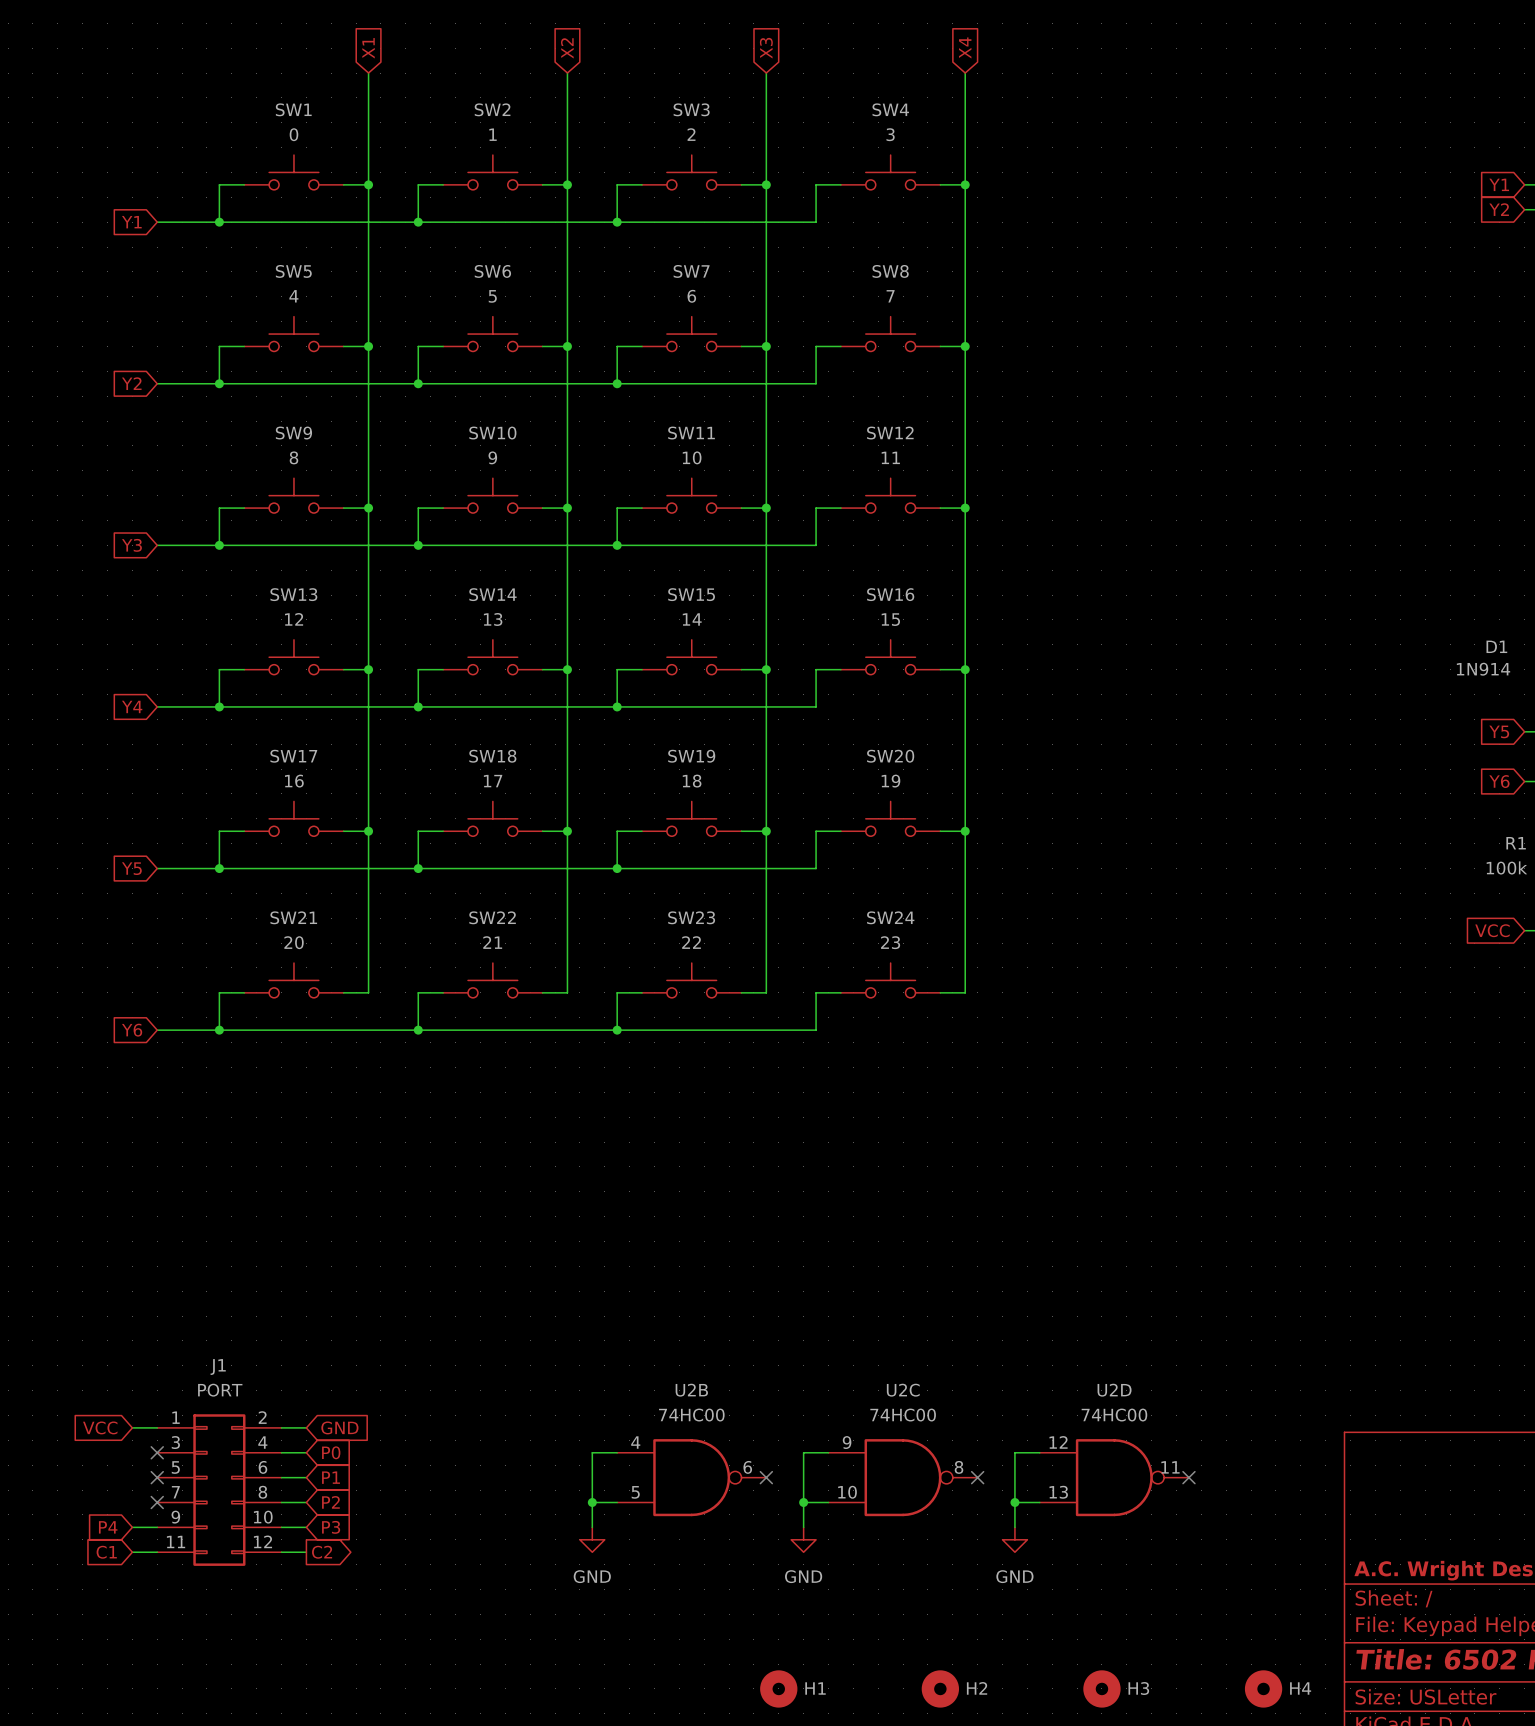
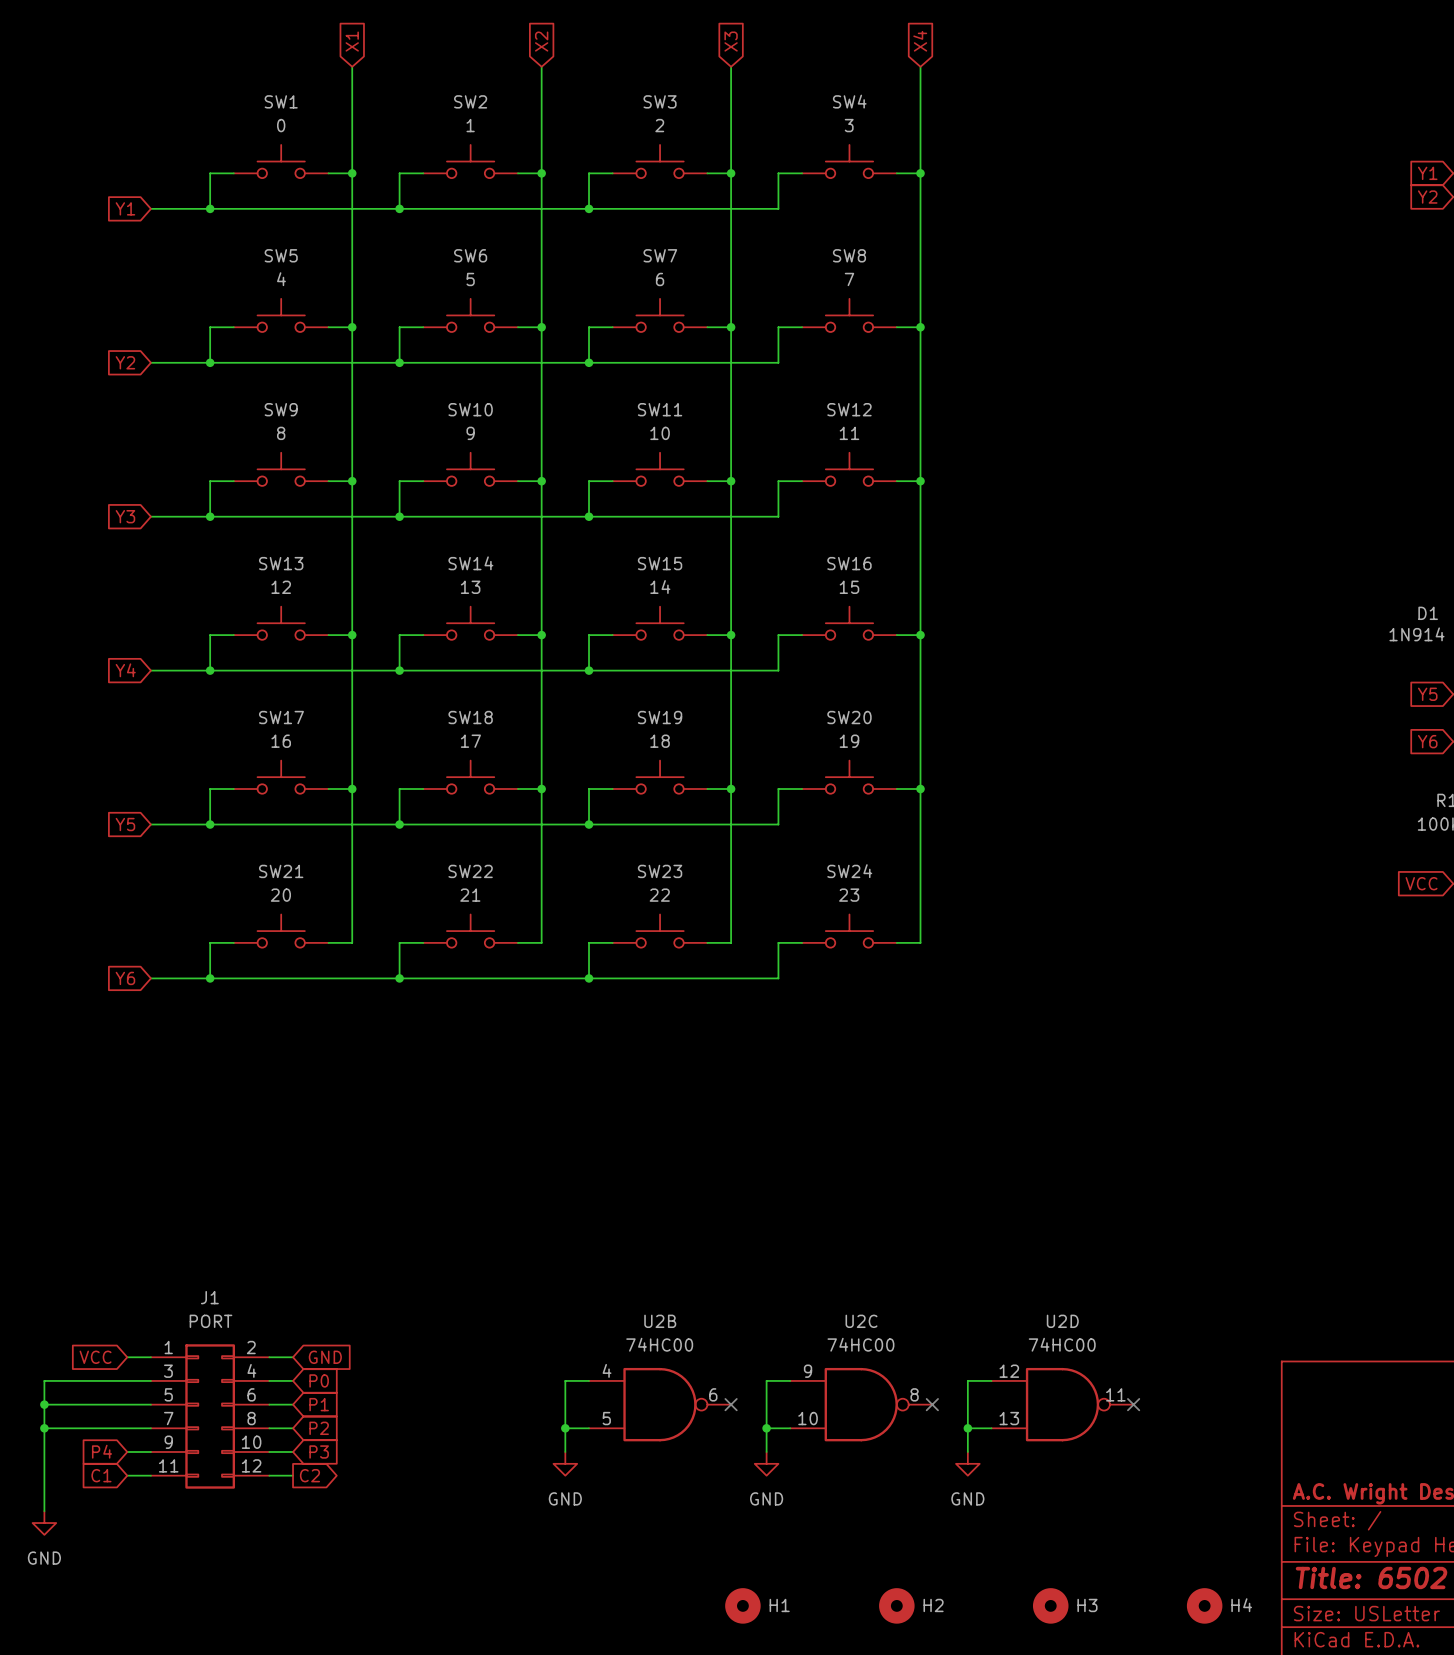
wire: none -> (150, 1380) (44, 1380) (44, 1511)
no-connect mark: (157, 1452) -> none
wire: none -> (44, 1404) (150, 1404)
junction: none -> (44, 1404)
no-connect mark: (157, 1477) -> none
wire: none -> (44, 1428) (150, 1428)
junction: none -> (44, 1428)
no-connect mark: (157, 1502) -> none
power symbol: none -> GND (44, 1523)

